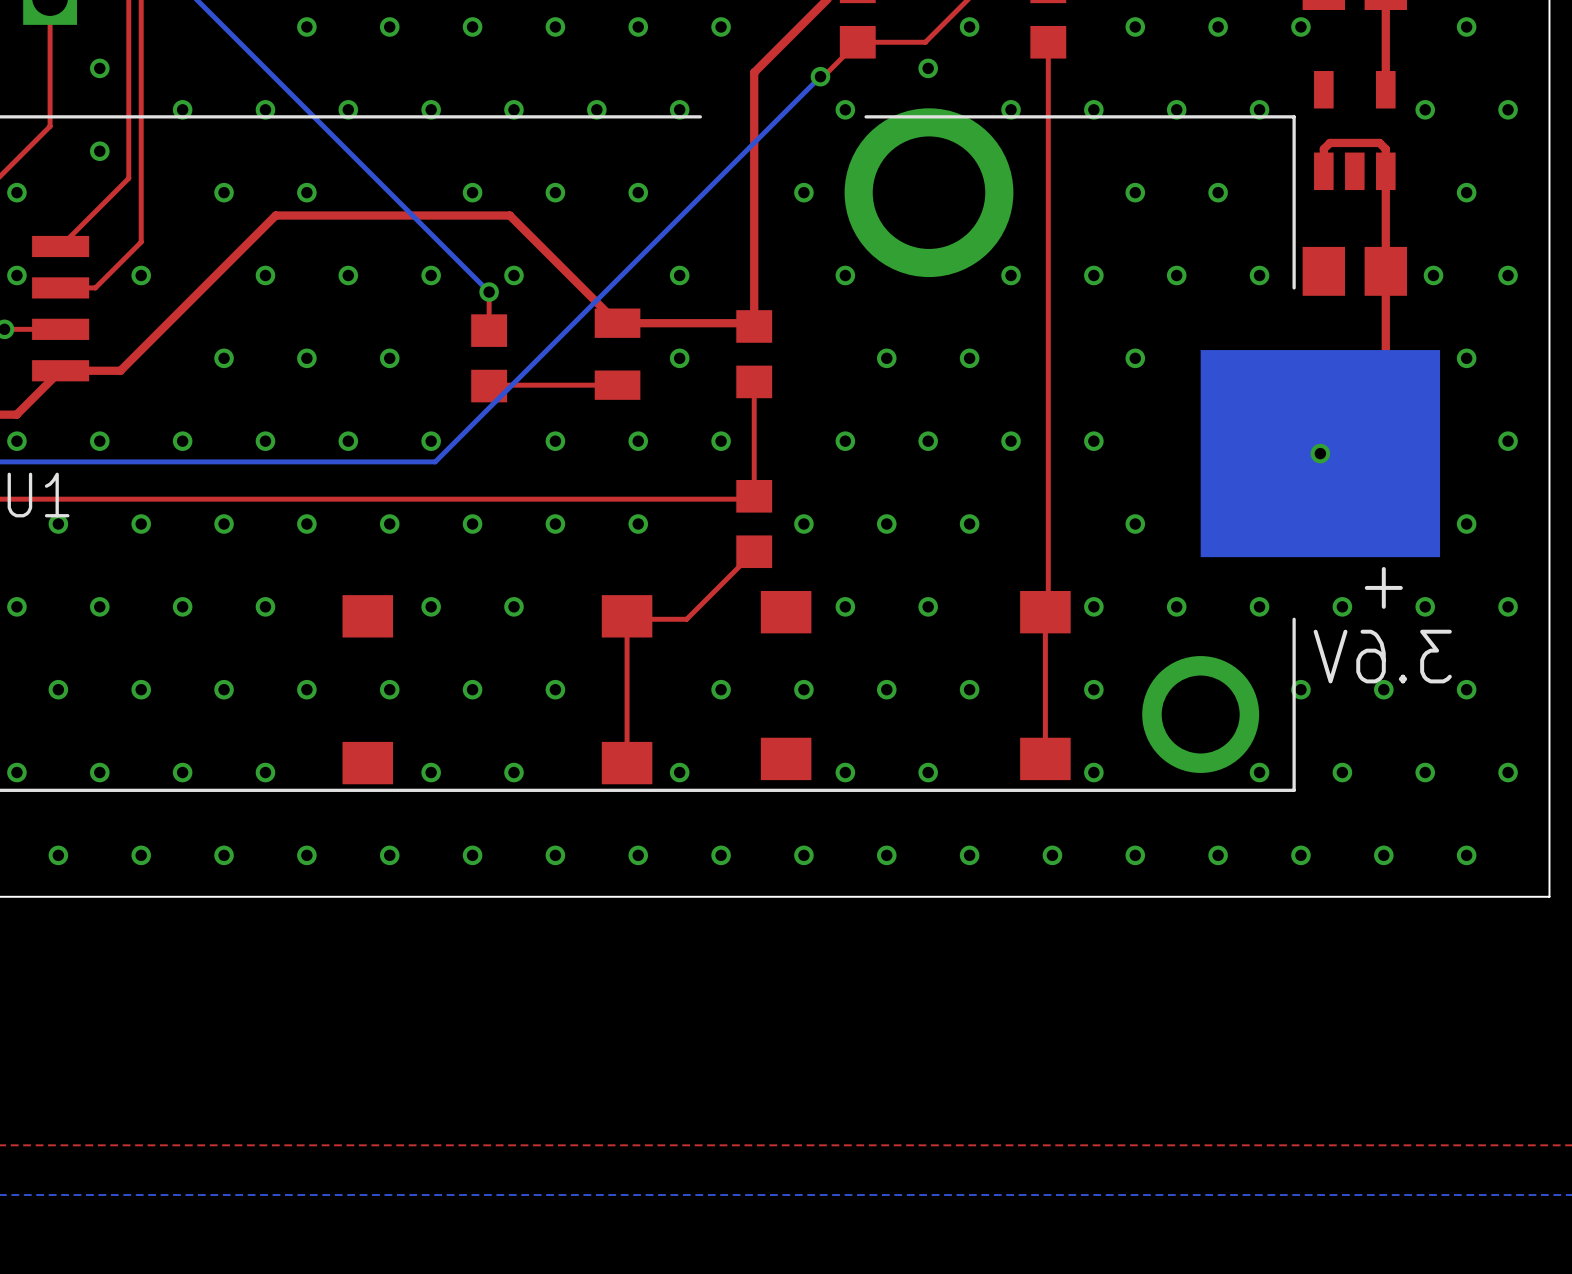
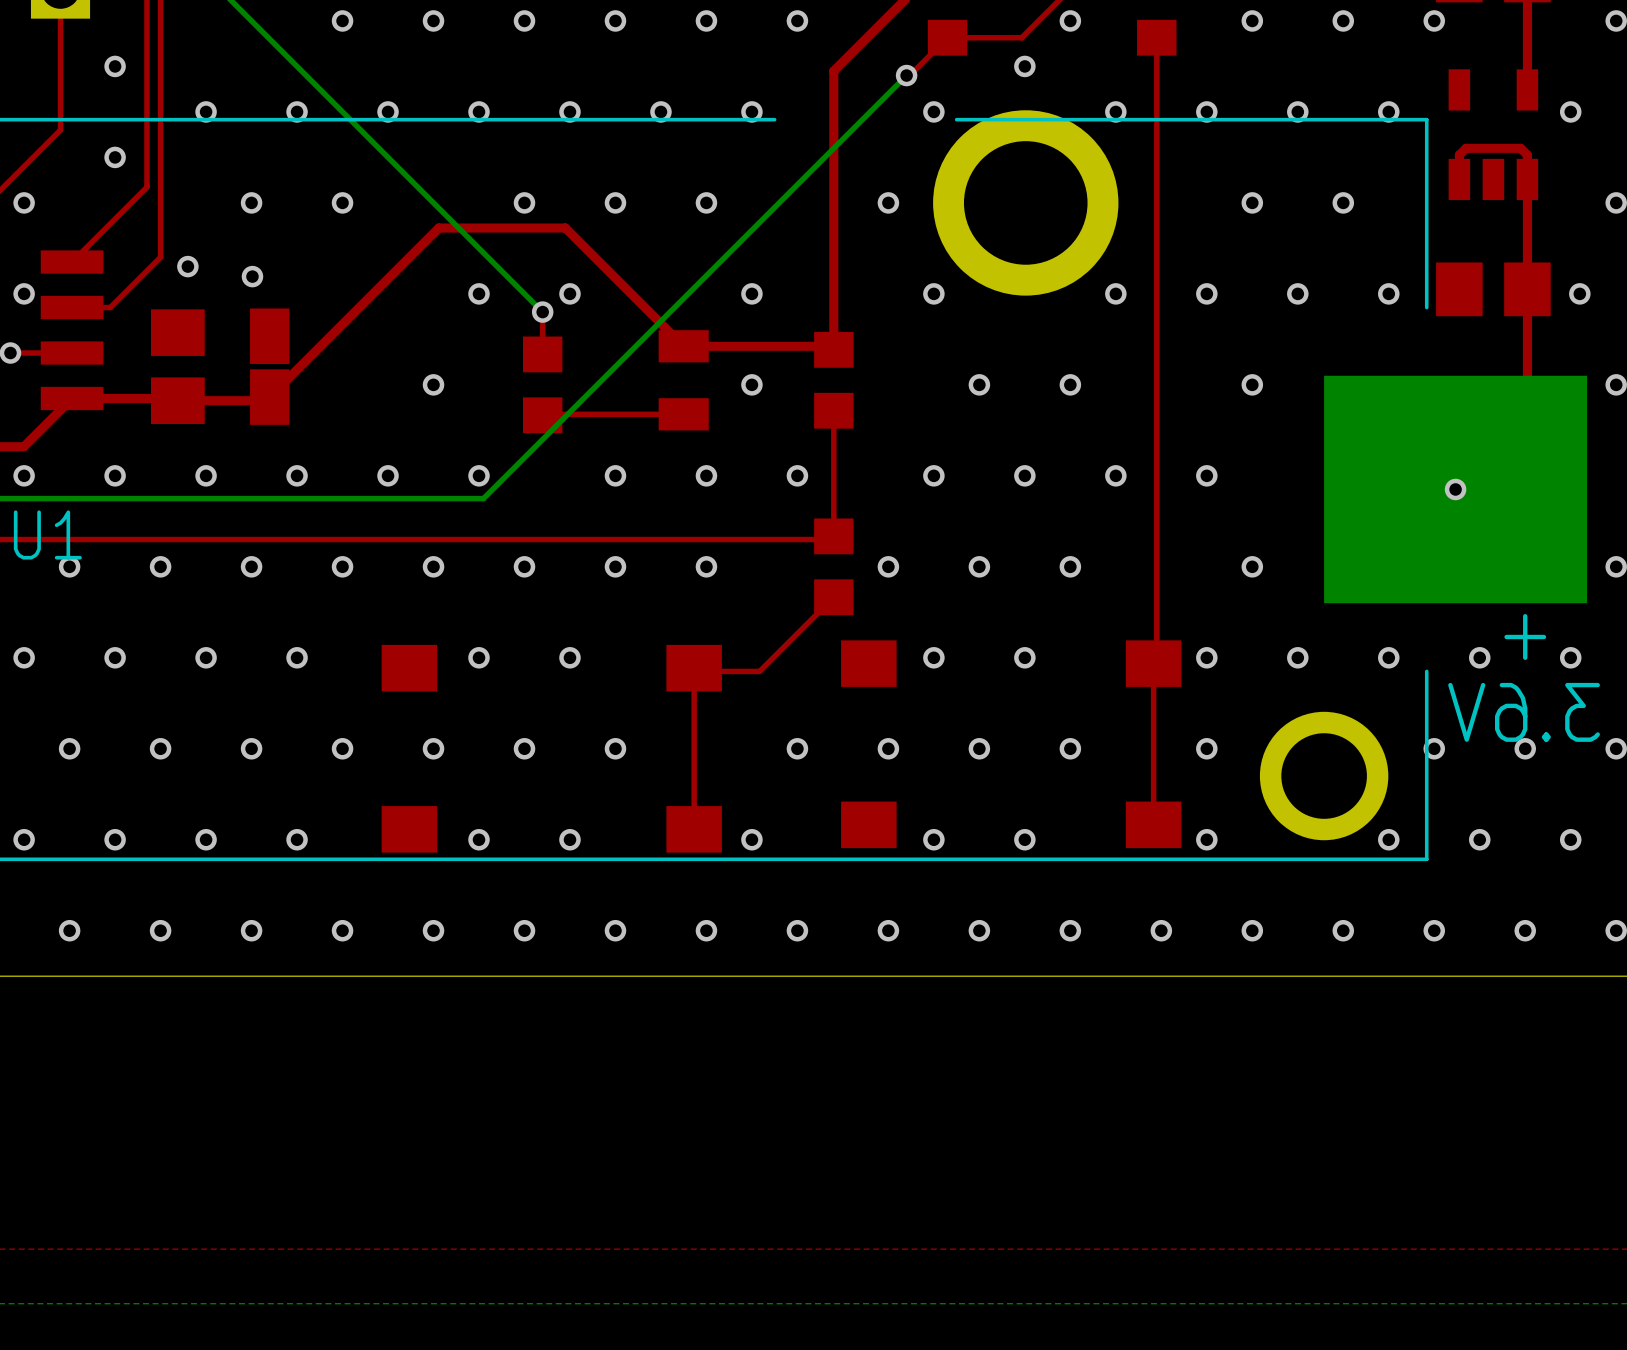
top track: (394, 215) (275, 215) (120, 370) -> (438, 228) (266, 400) (177, 400) (175, 398) (137, 398)
via: none -> (252, 276)
via position: (141, 275) -> (187, 266)
via: (265, 275) -> none
via: (348, 275) -> none
part: none -> (177, 366)
part: none -> (269, 366)
via: (224, 358) -> none
via: (306, 358) -> none

